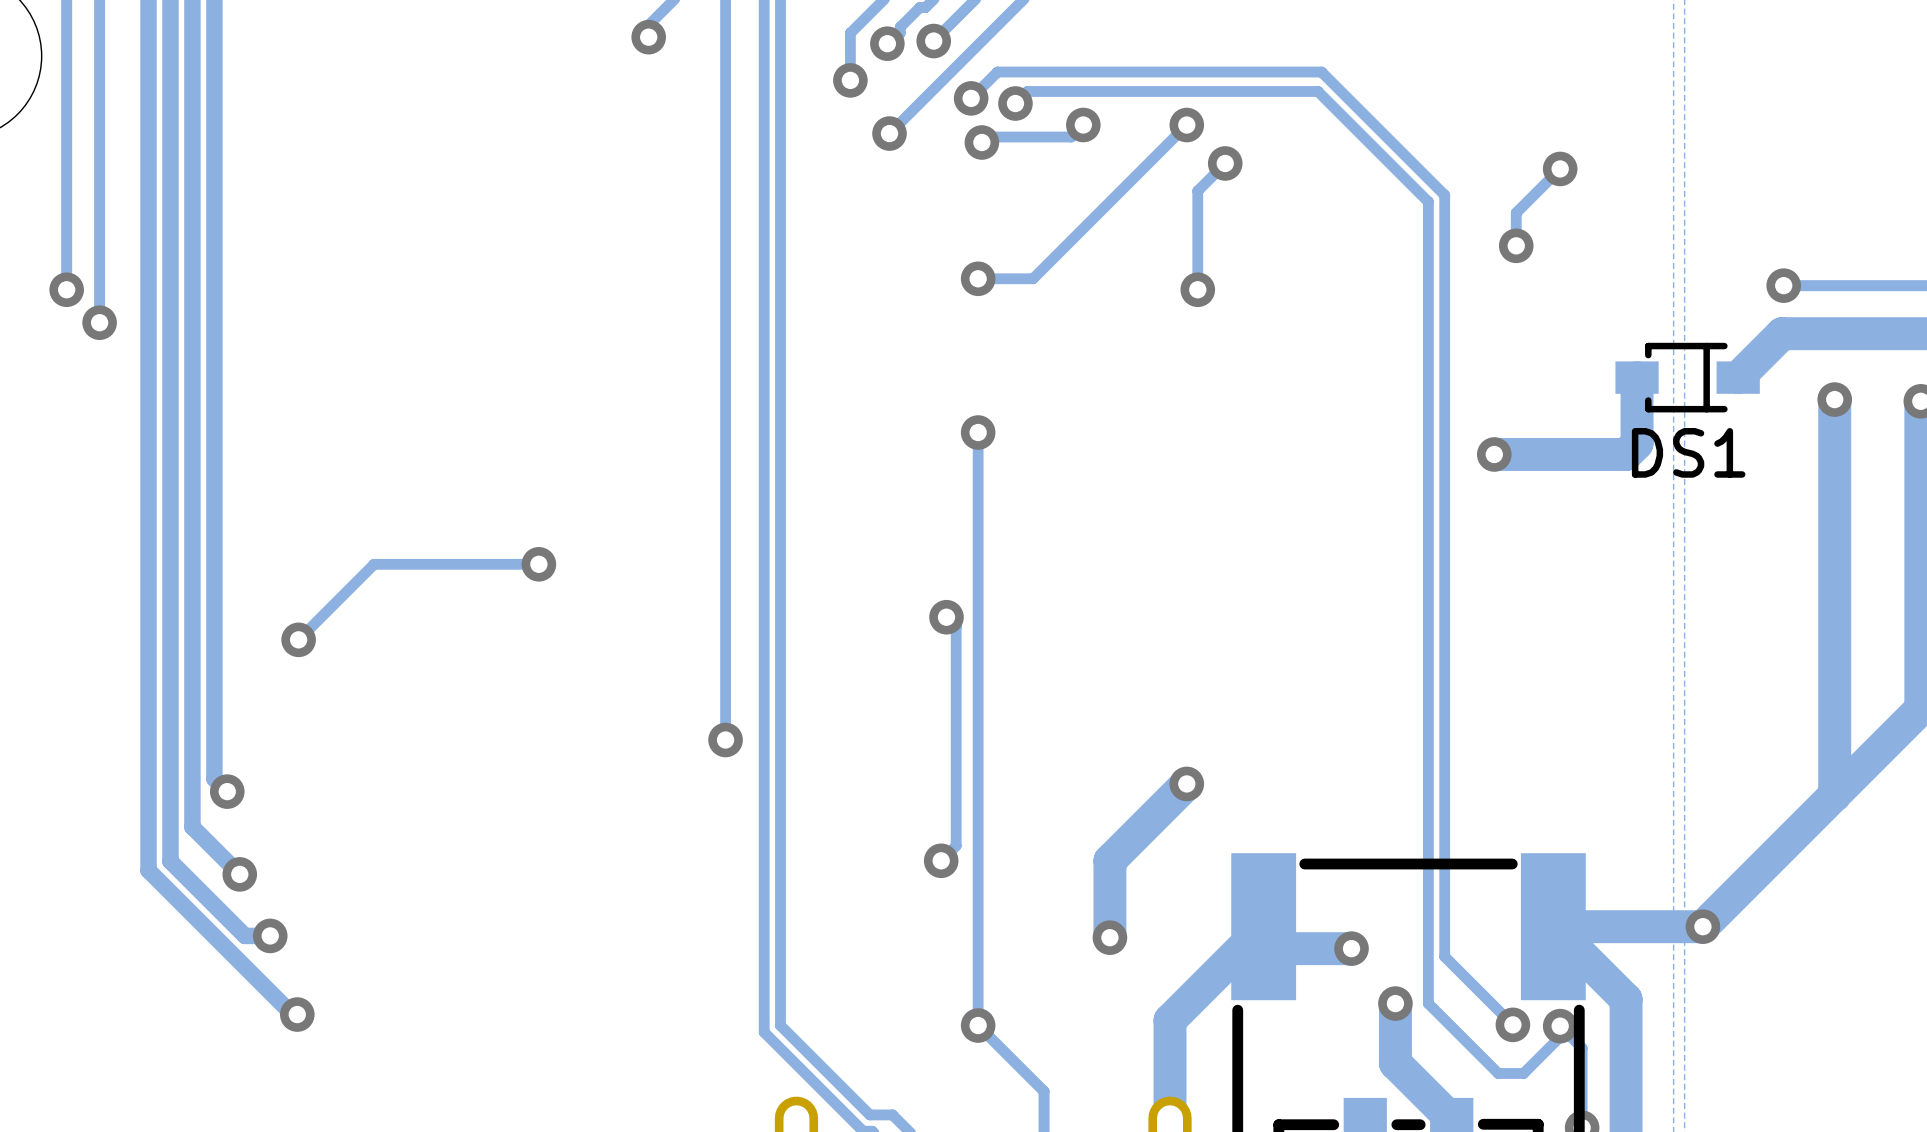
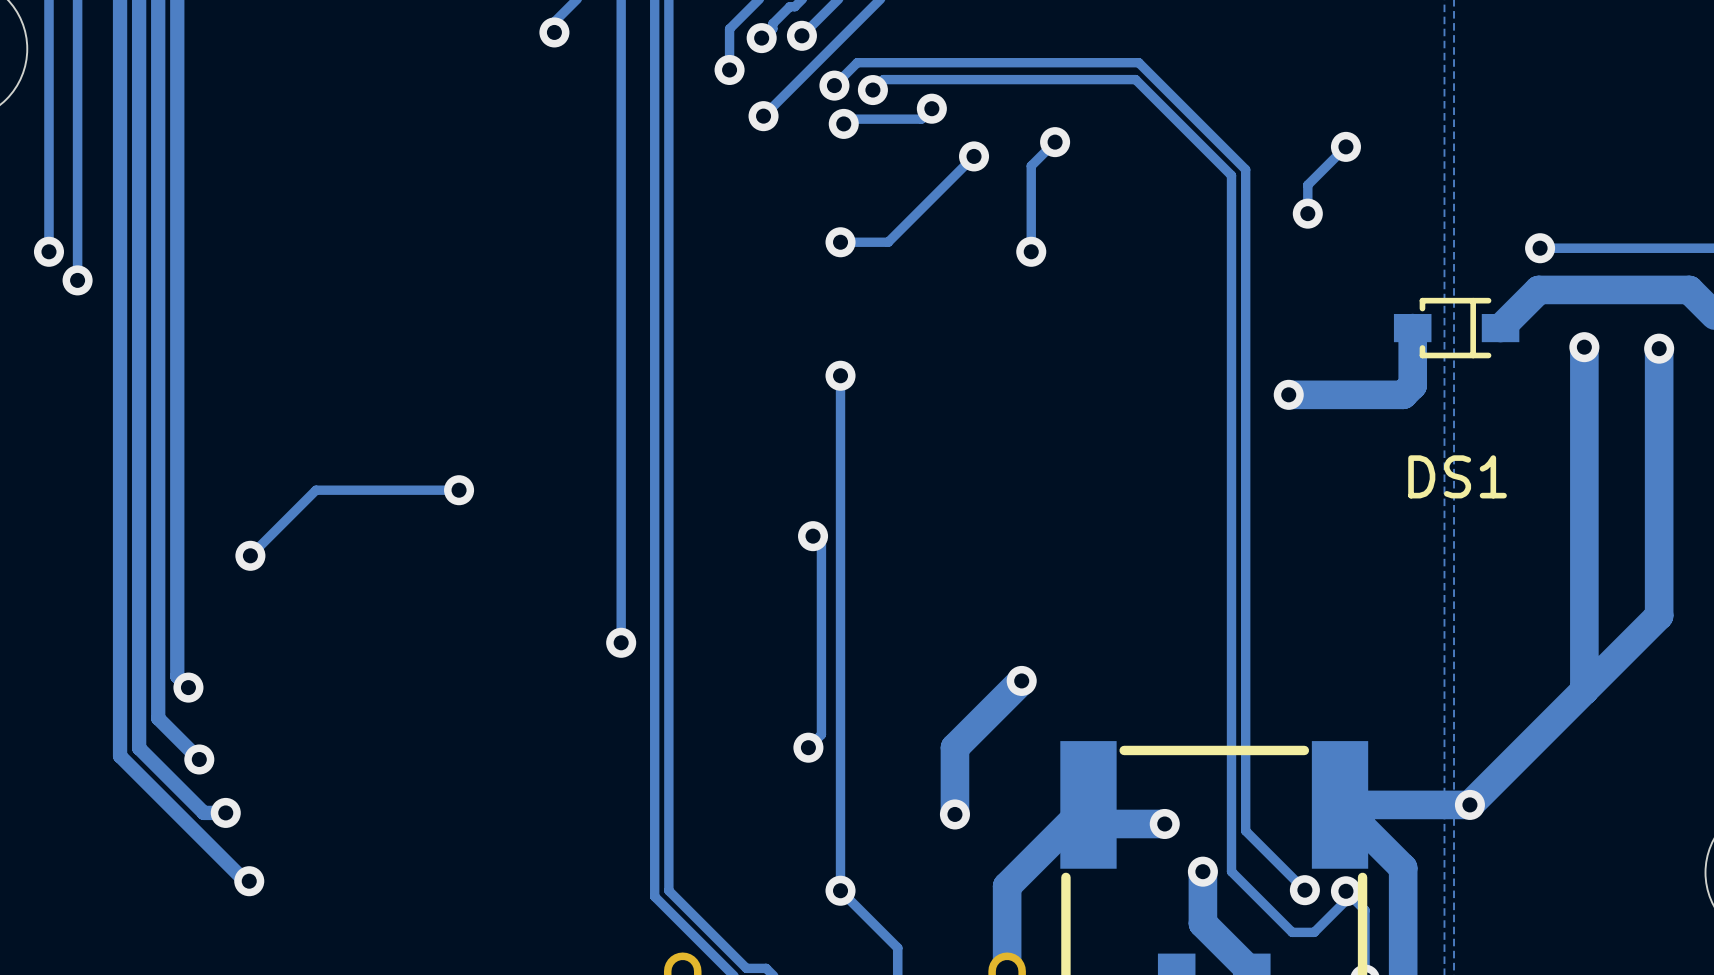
track: (1186, 125) (1131, 179) -> none
via position: (1186, 125) -> (974, 156)
DS1 name position: DS1 (1688, 452) -> DS1 (1457, 476)

